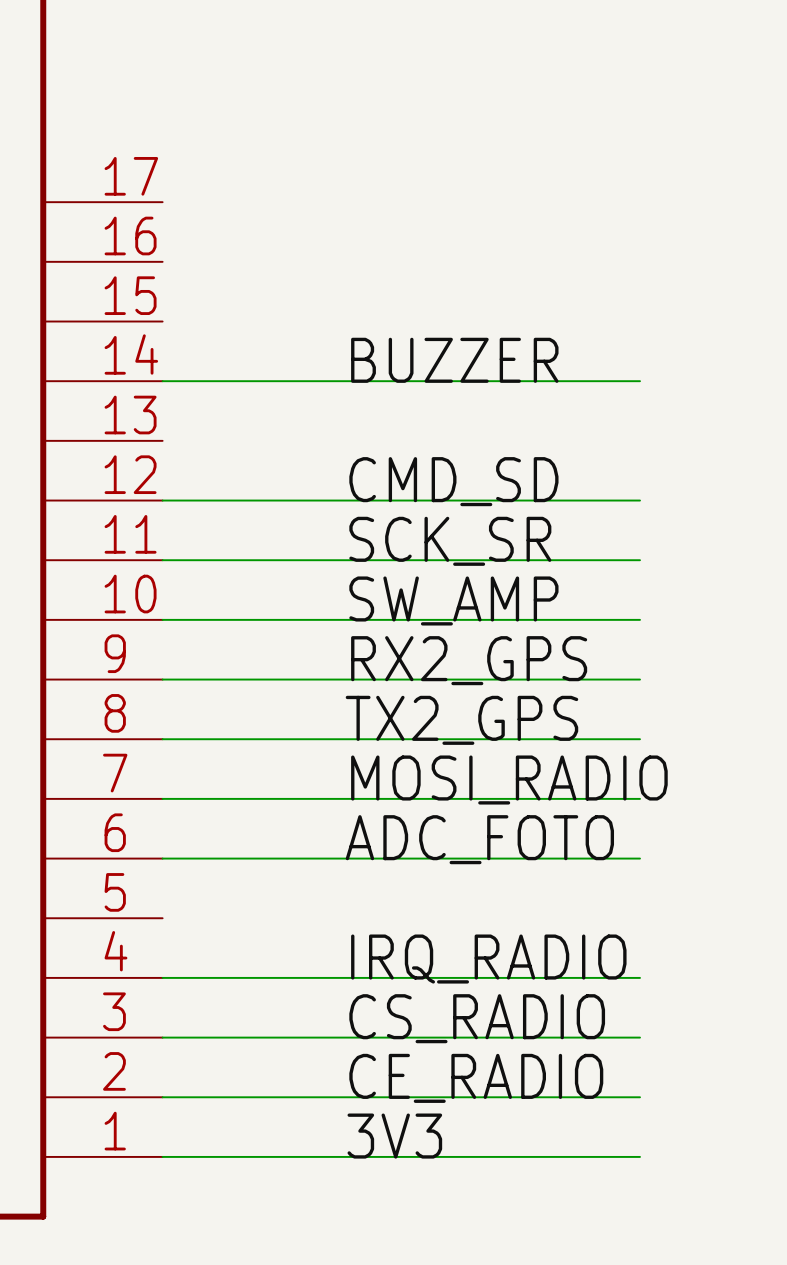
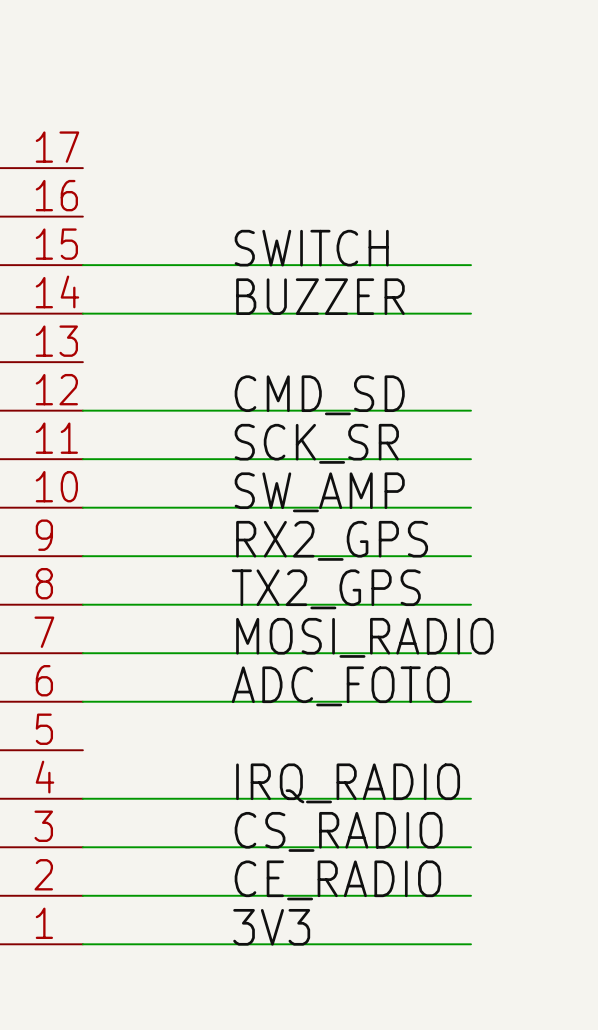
label: none -> SWITCH (311, 248)
wire: none -> (82, 265) (470, 265)

